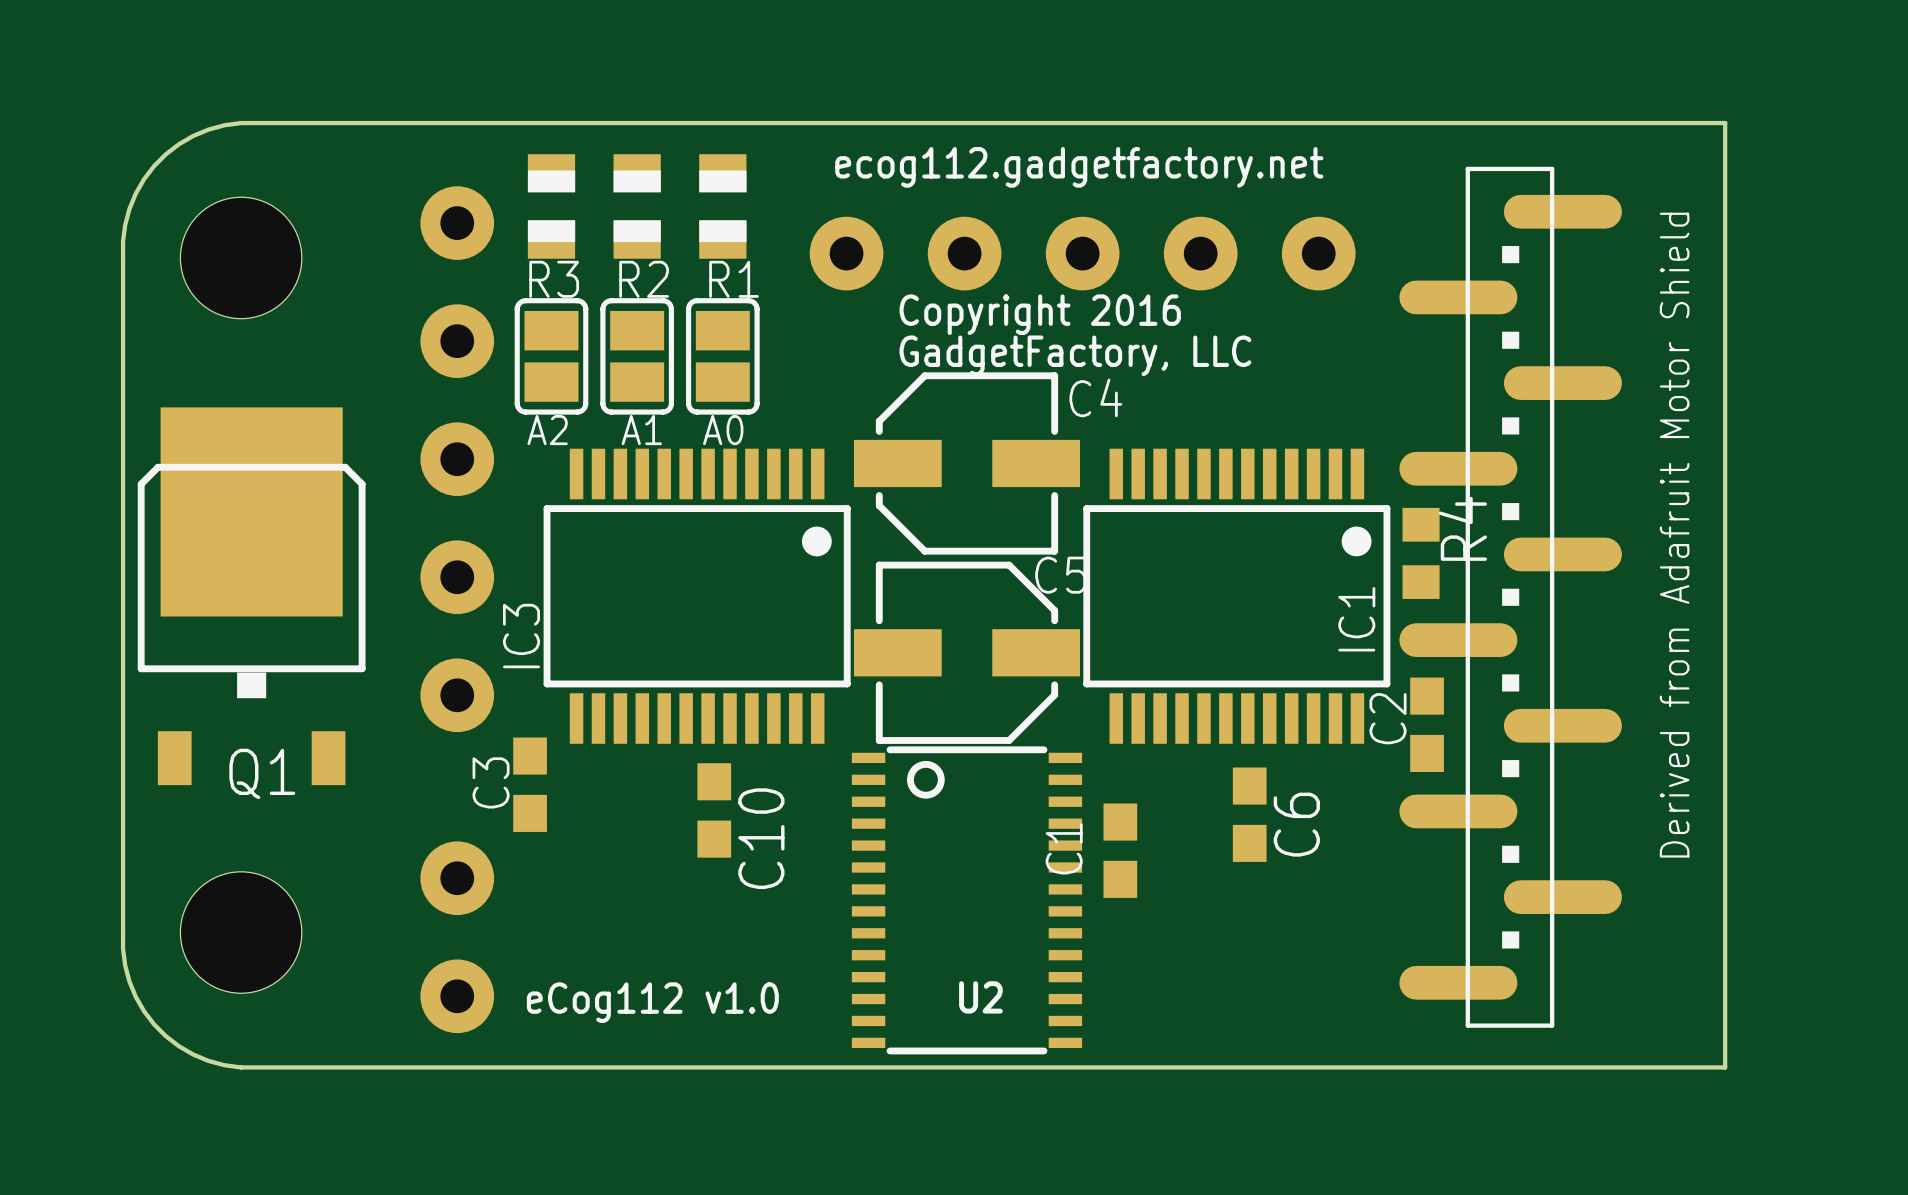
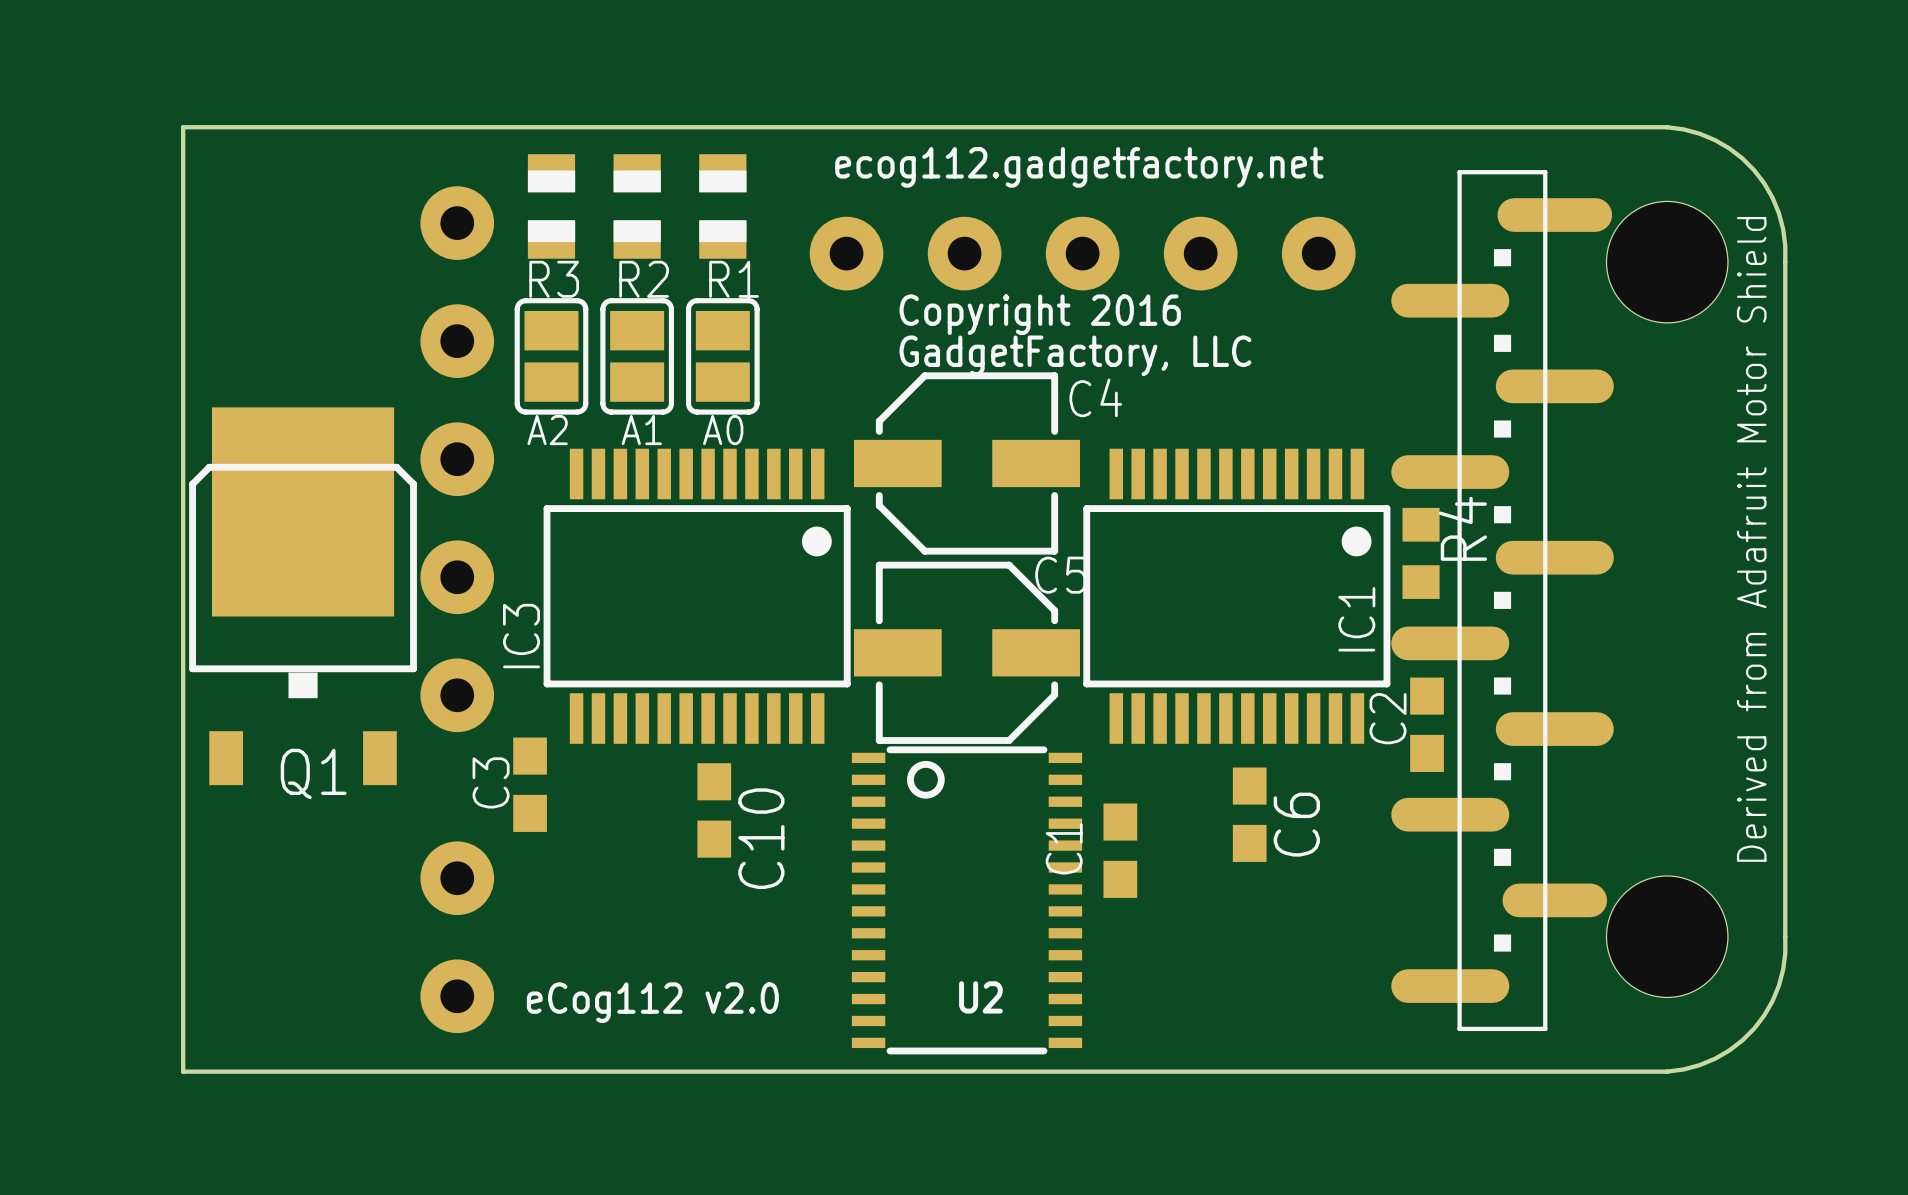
text position: Derived from Adafruit Motor Shield (1674, 535) -> Derived from Adafruit Motor Shield (1751, 539)
part: (924, 595) -> none
Q1 position: (251, 596) -> (303, 596)
part: none -> (984, 599)
text: eCog112 v1.0 (652, 1002) -> eCog112 v2.0 (652, 1002)

